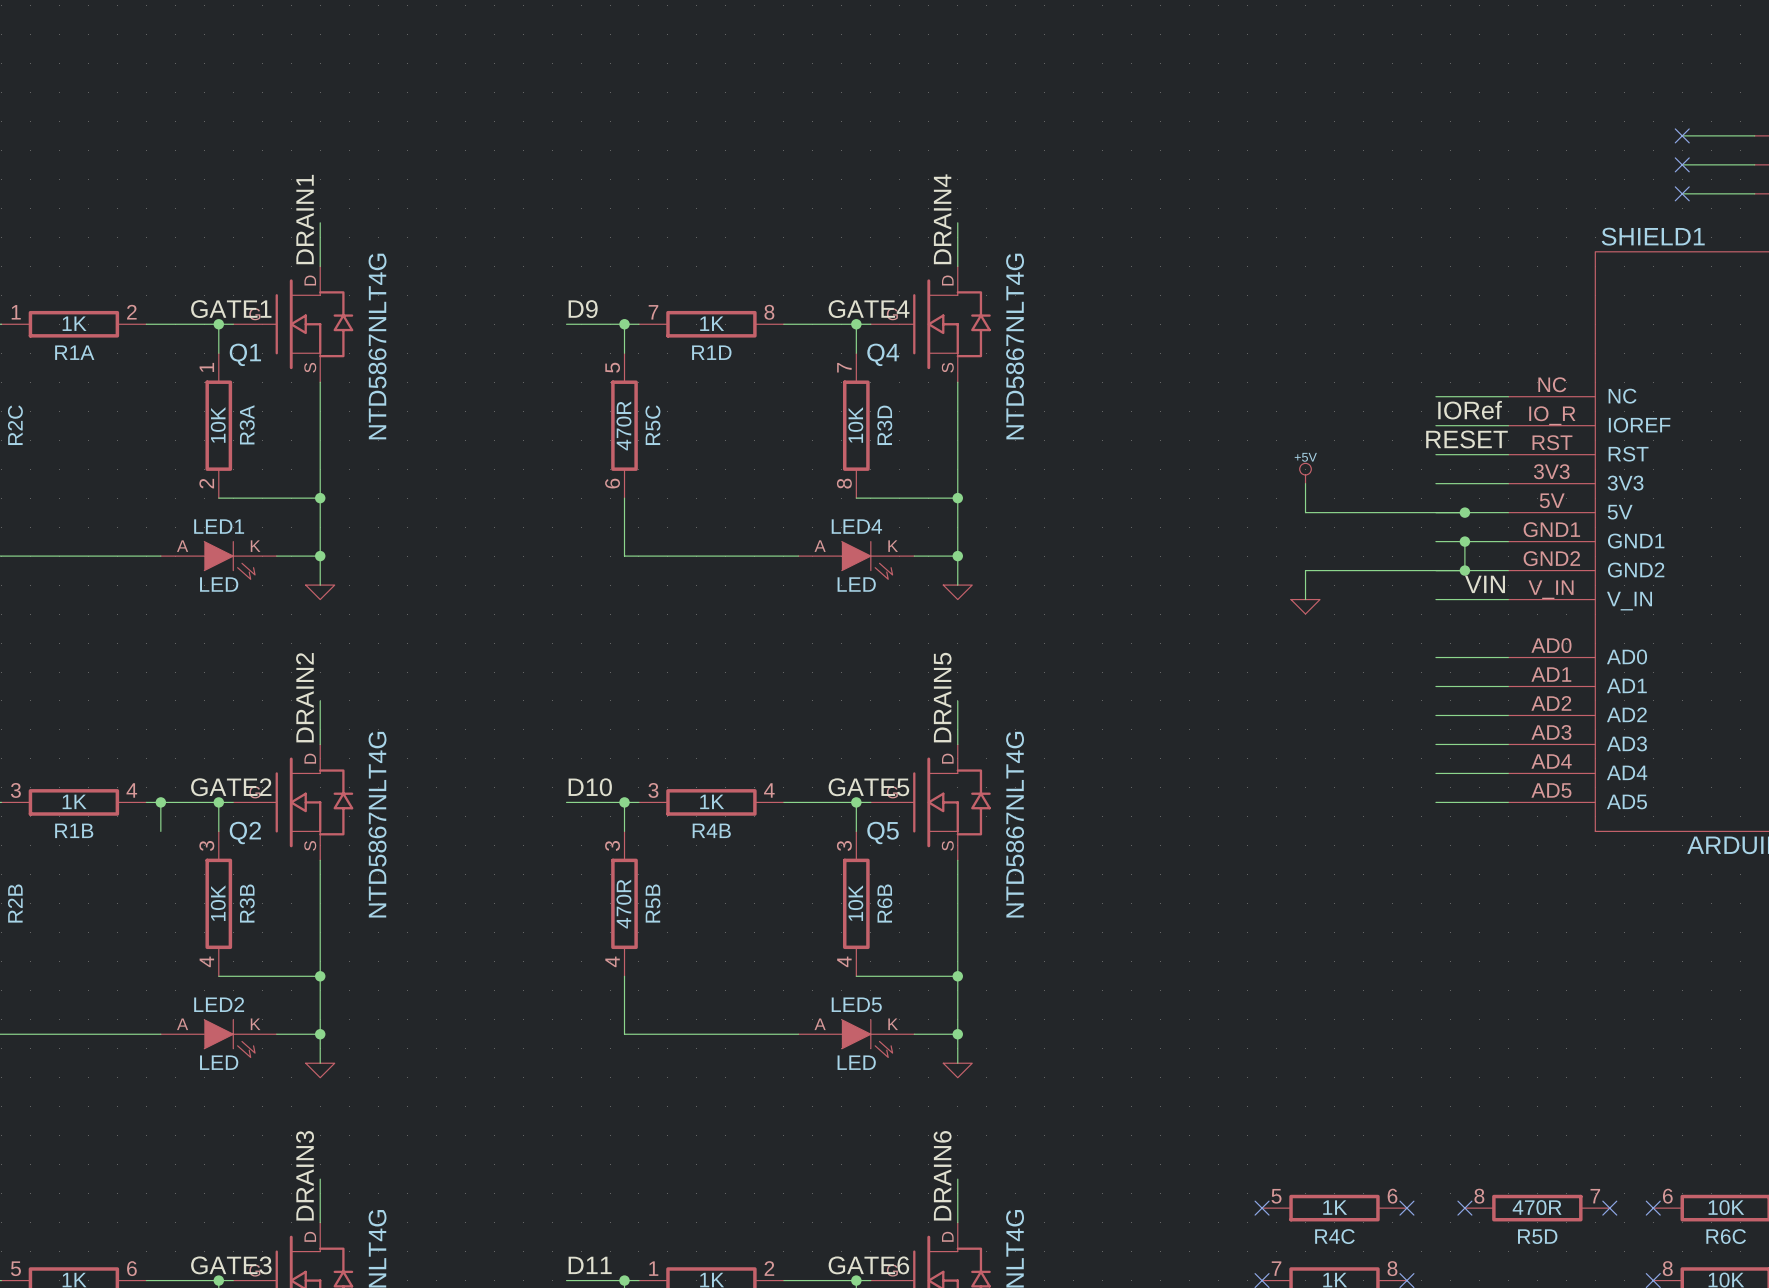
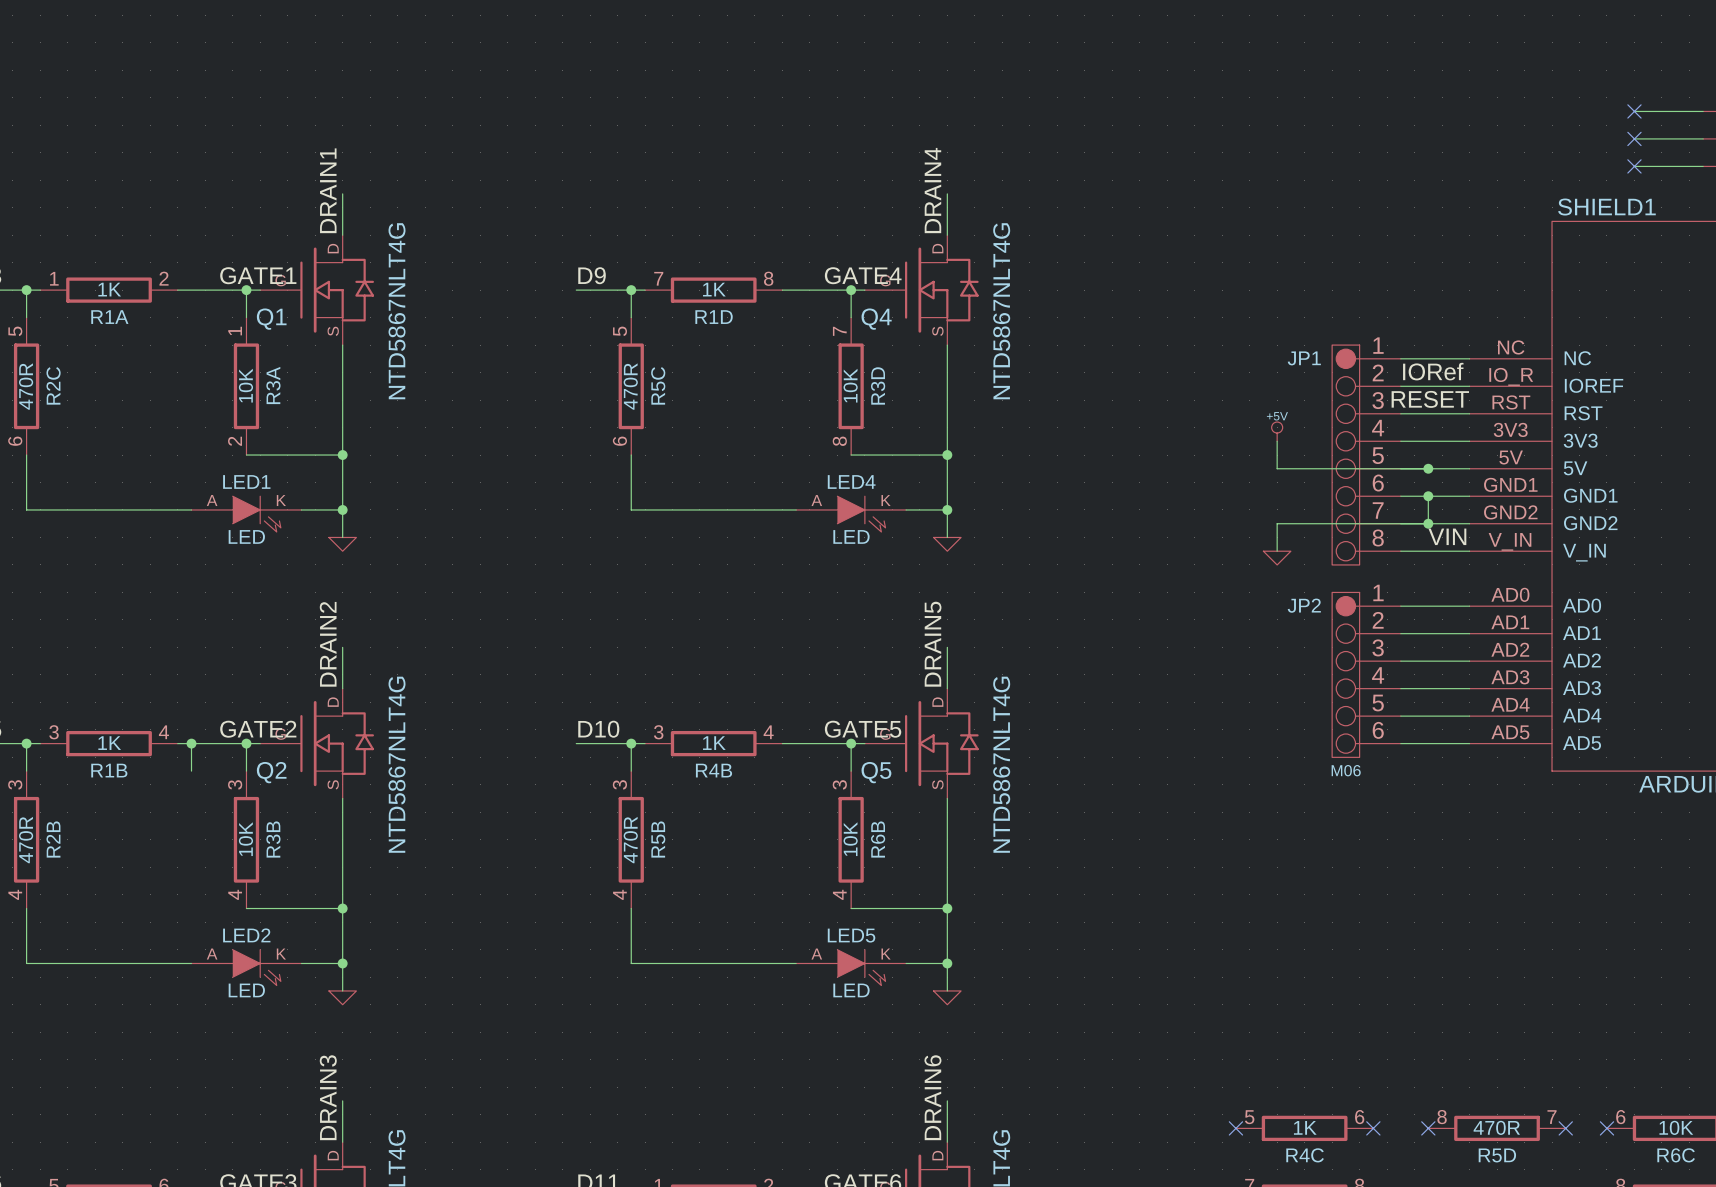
JP1: none -> (1366, 455)
JP2: none -> M06 (1366, 674)

